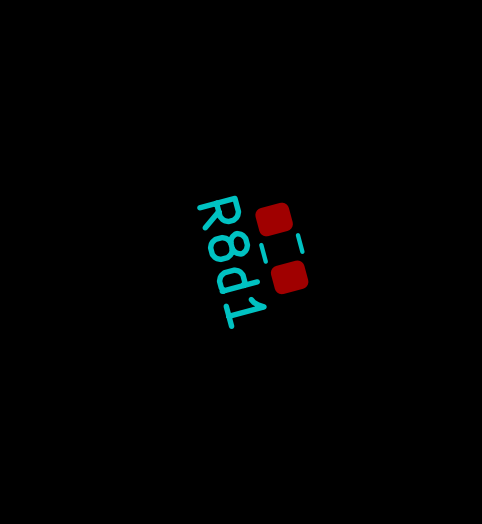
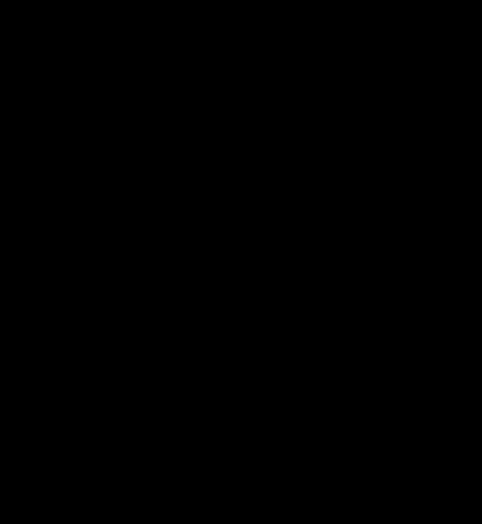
R8d1: (281, 248) -> none

